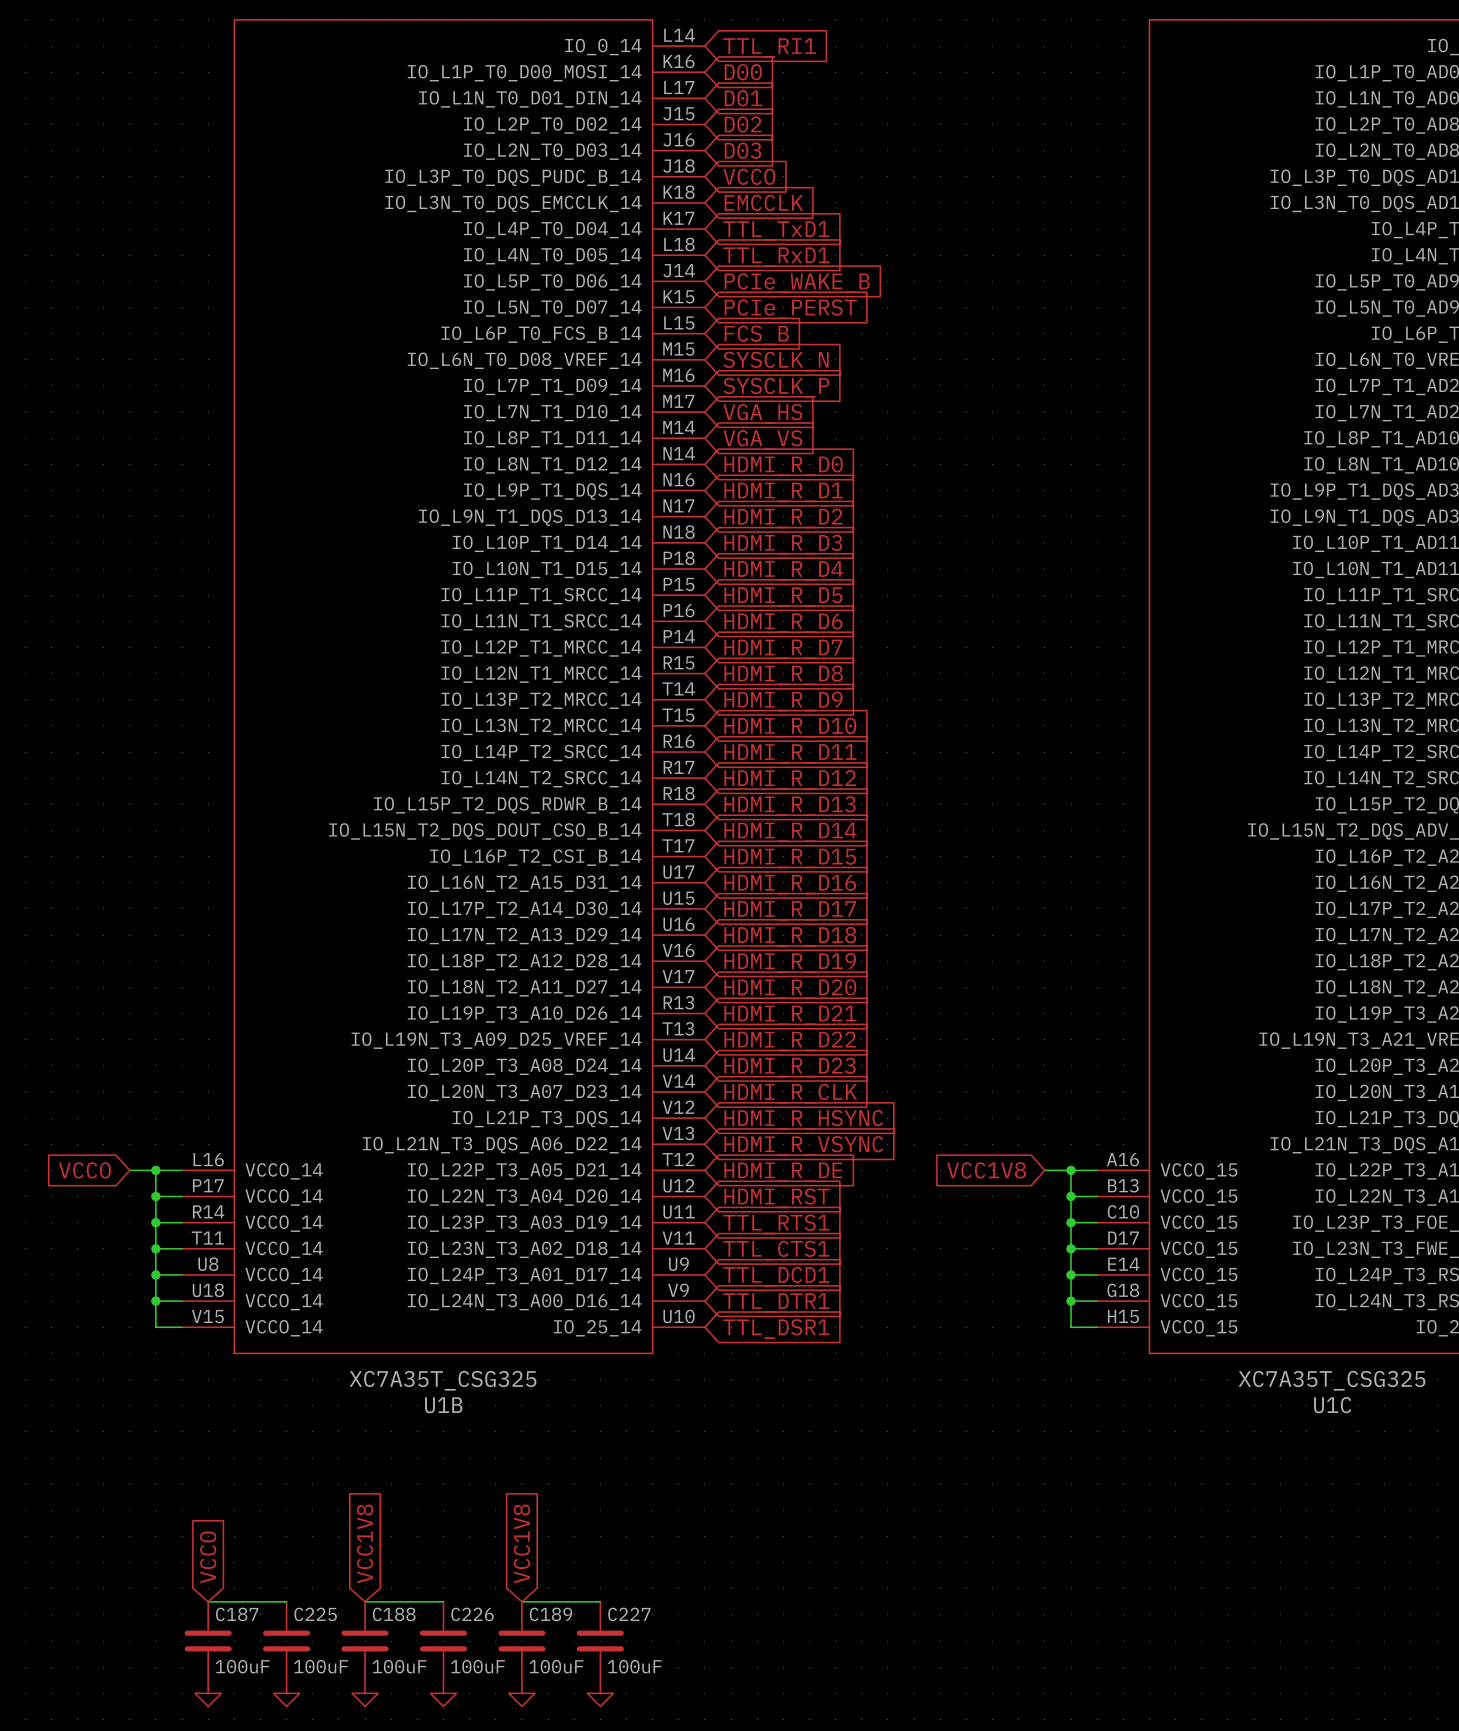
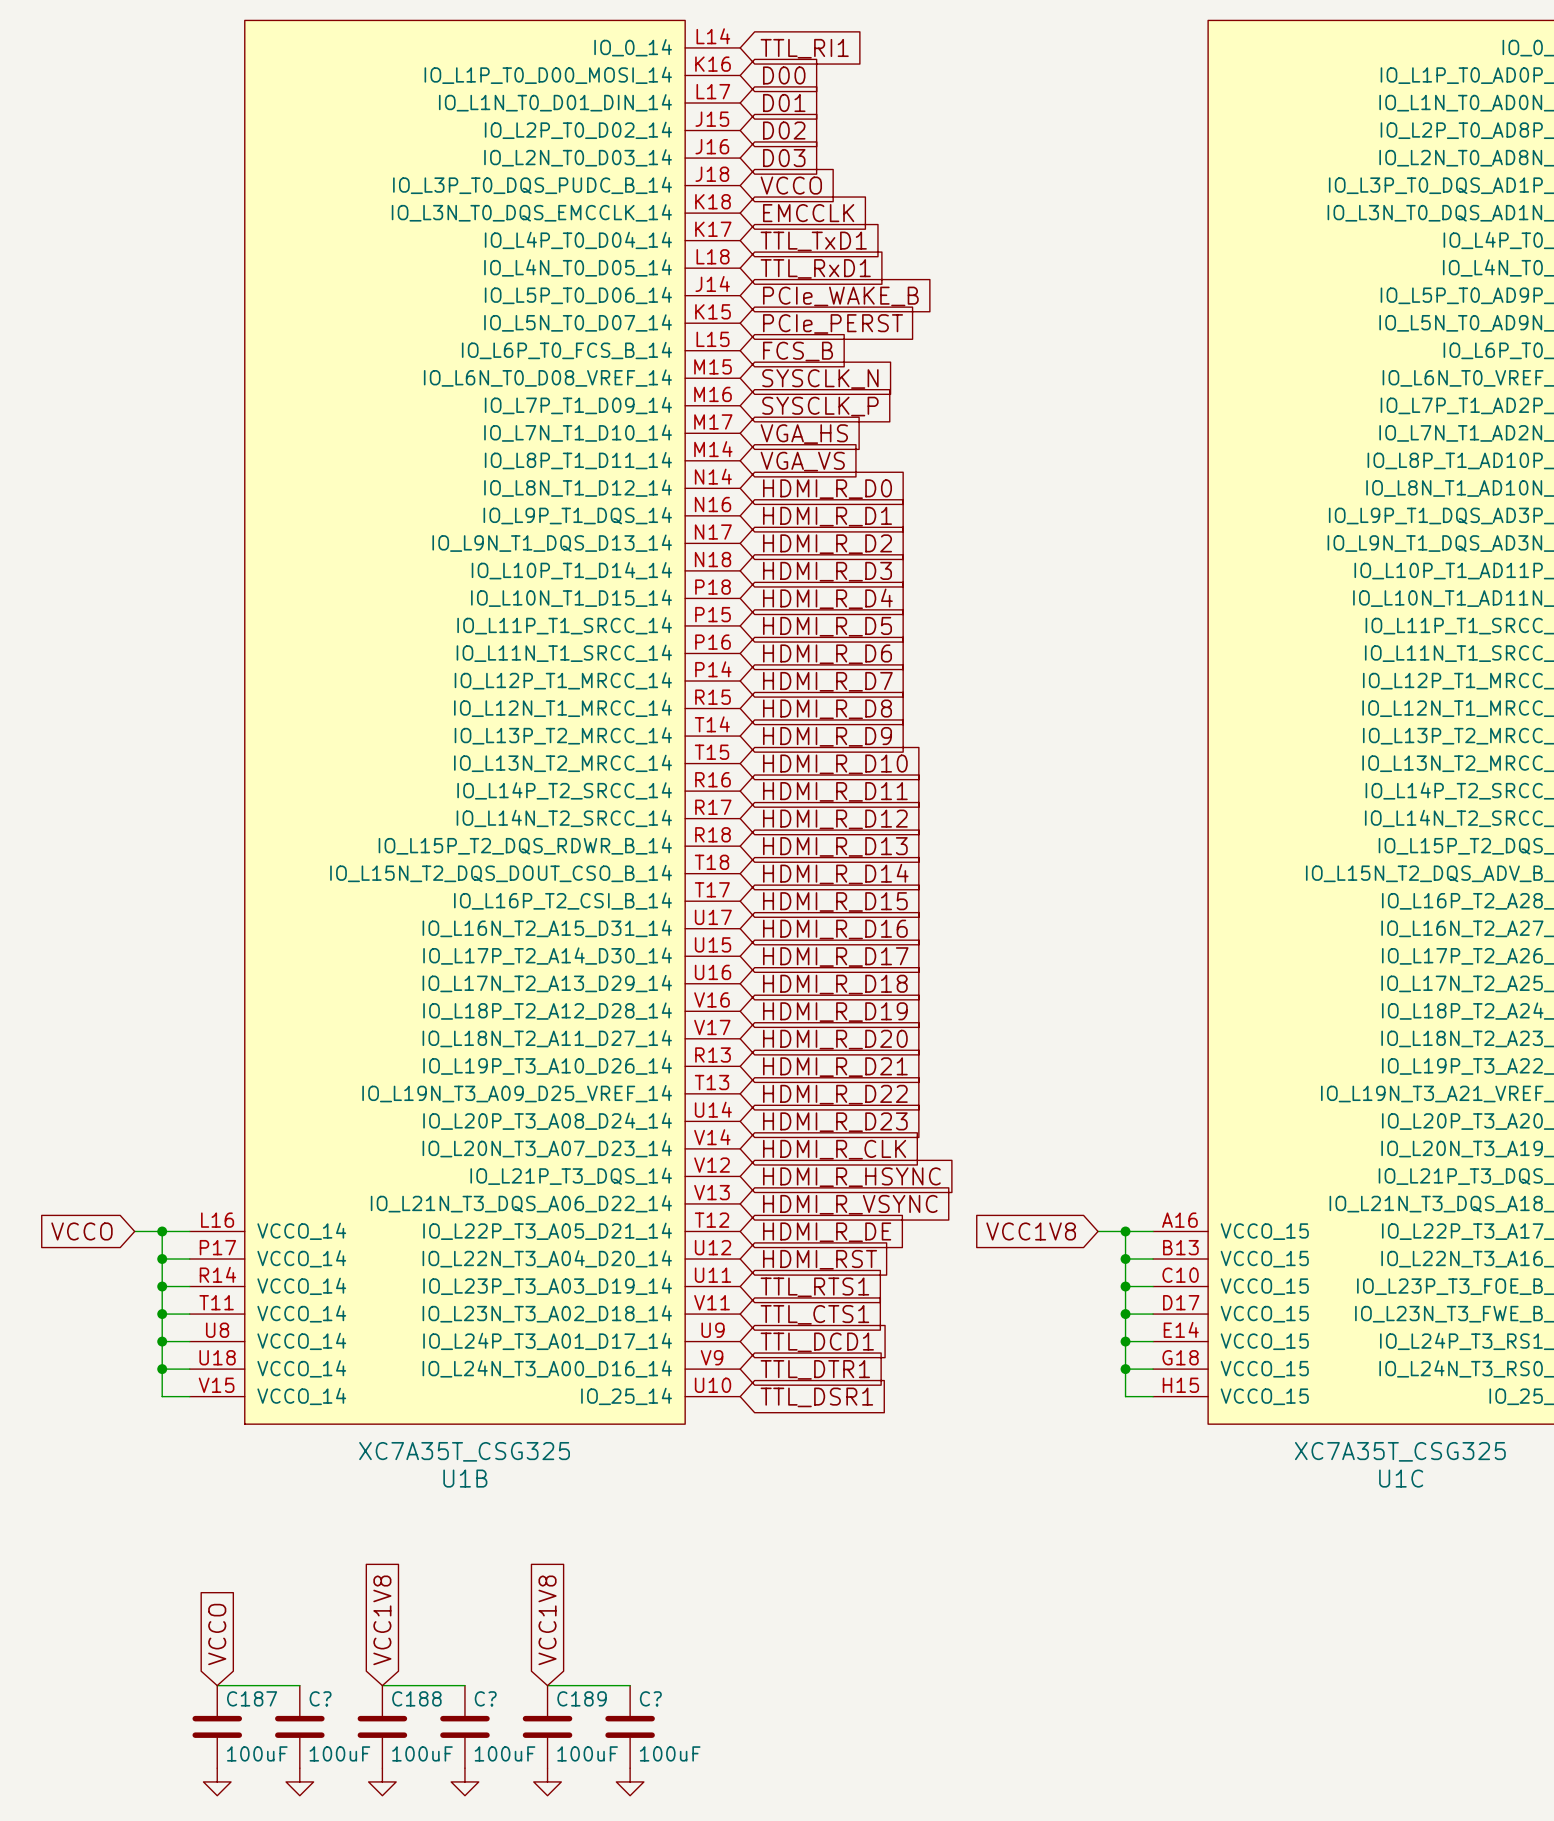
C225 name: C225 (315, 1614) -> C? (320, 1698)
C226 name: C226 (472, 1614) -> C? (485, 1698)
C227 name: C227 (629, 1614) -> C? (650, 1698)

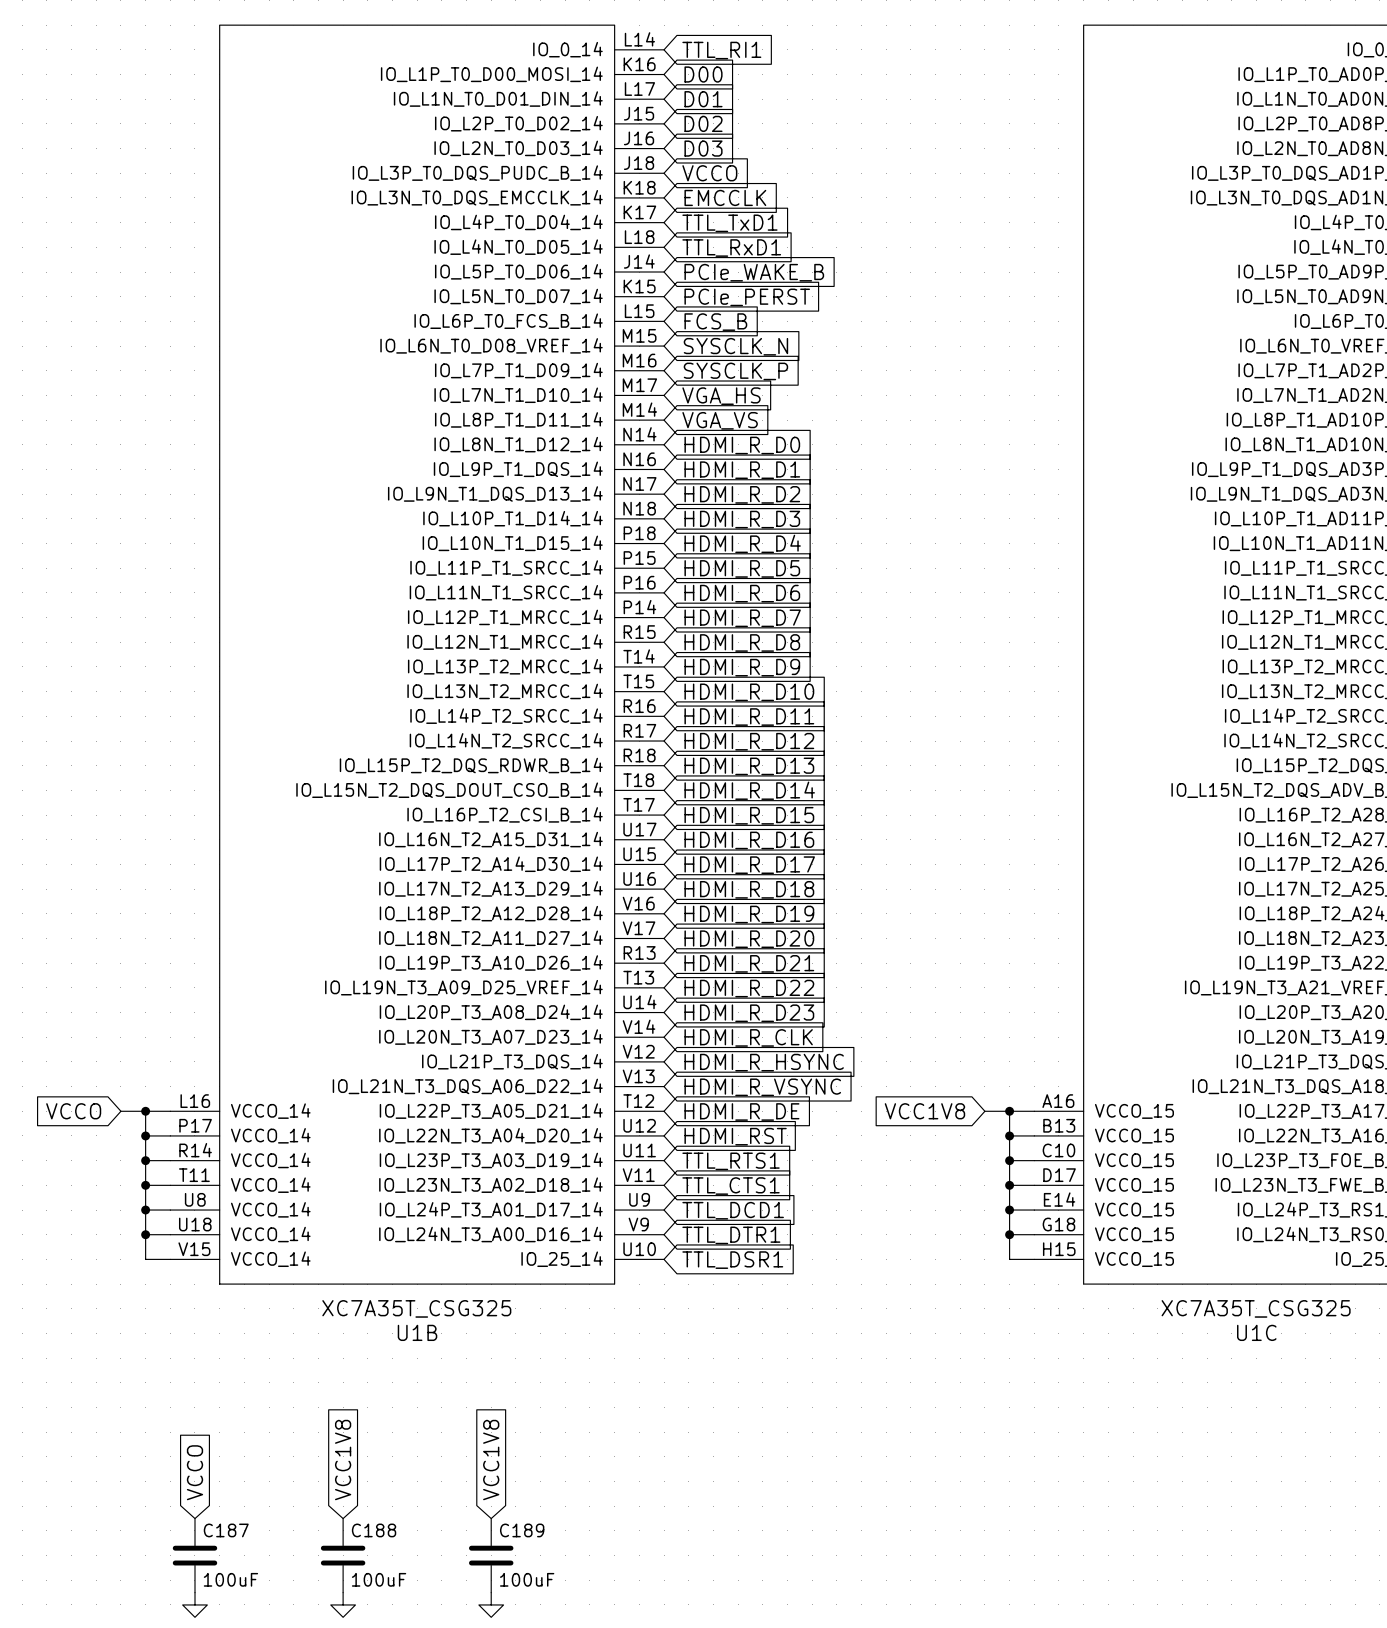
wire: (217, 1685) (299, 1685) -> none
wire: (382, 1685) (464, 1685) -> none
wire: (547, 1685) (630, 1685) -> none
C?: 100uF (299, 1726) -> none
C?: 100uF (464, 1726) -> none
C?: 100uF (630, 1726) -> none
power symbol: (299, 1781) -> none
power symbol: (464, 1781) -> none
power symbol: (630, 1781) -> none

